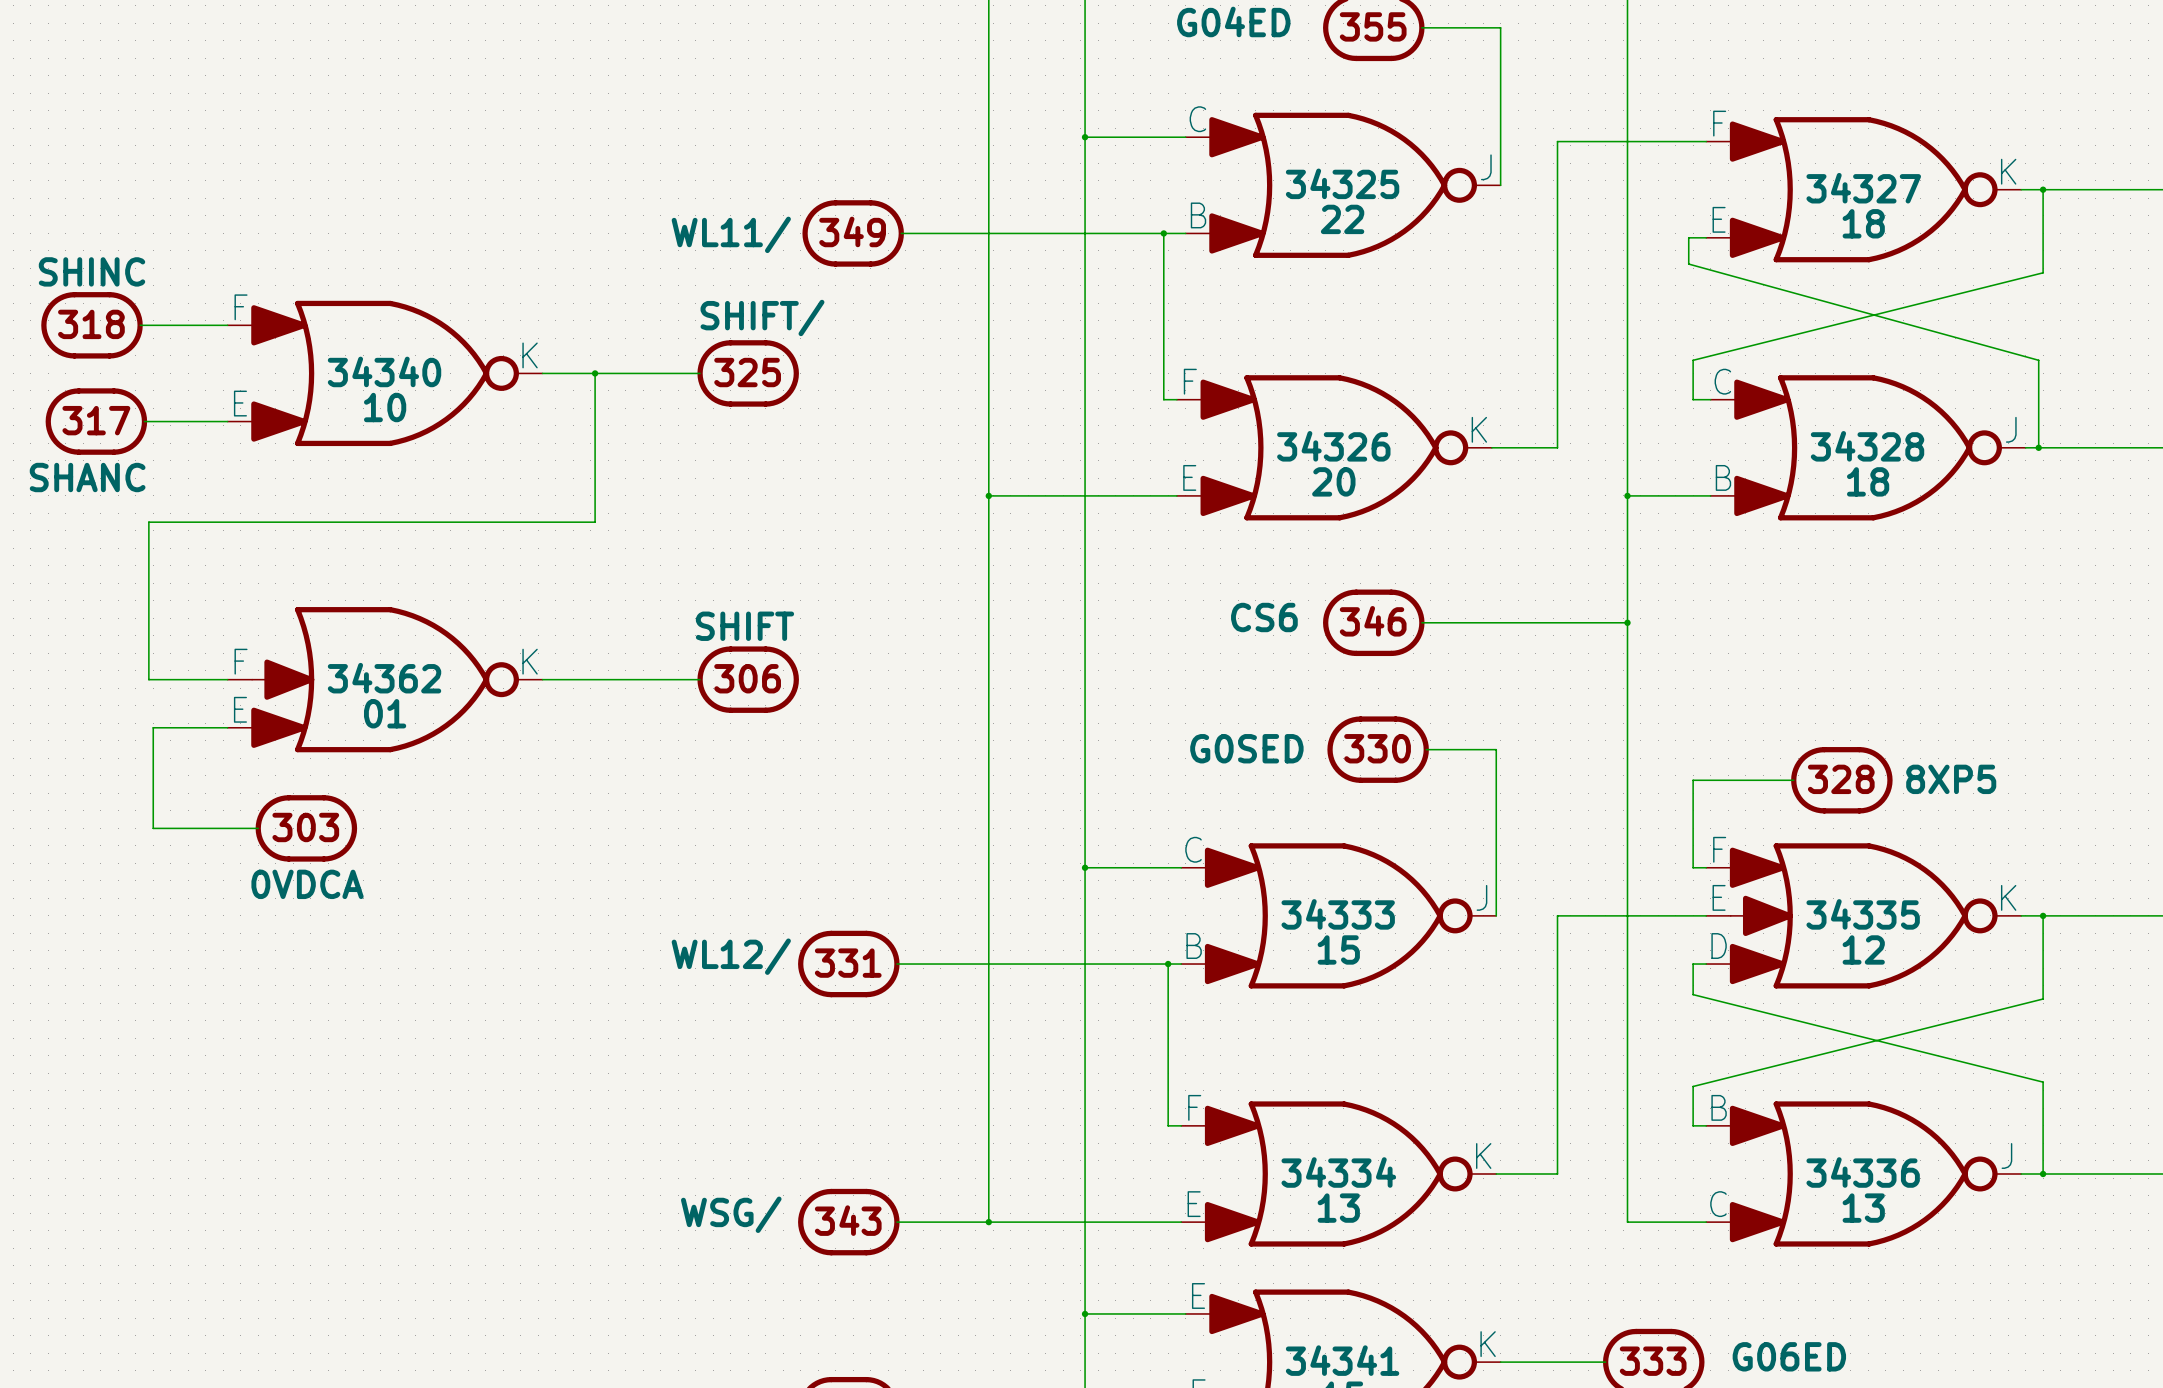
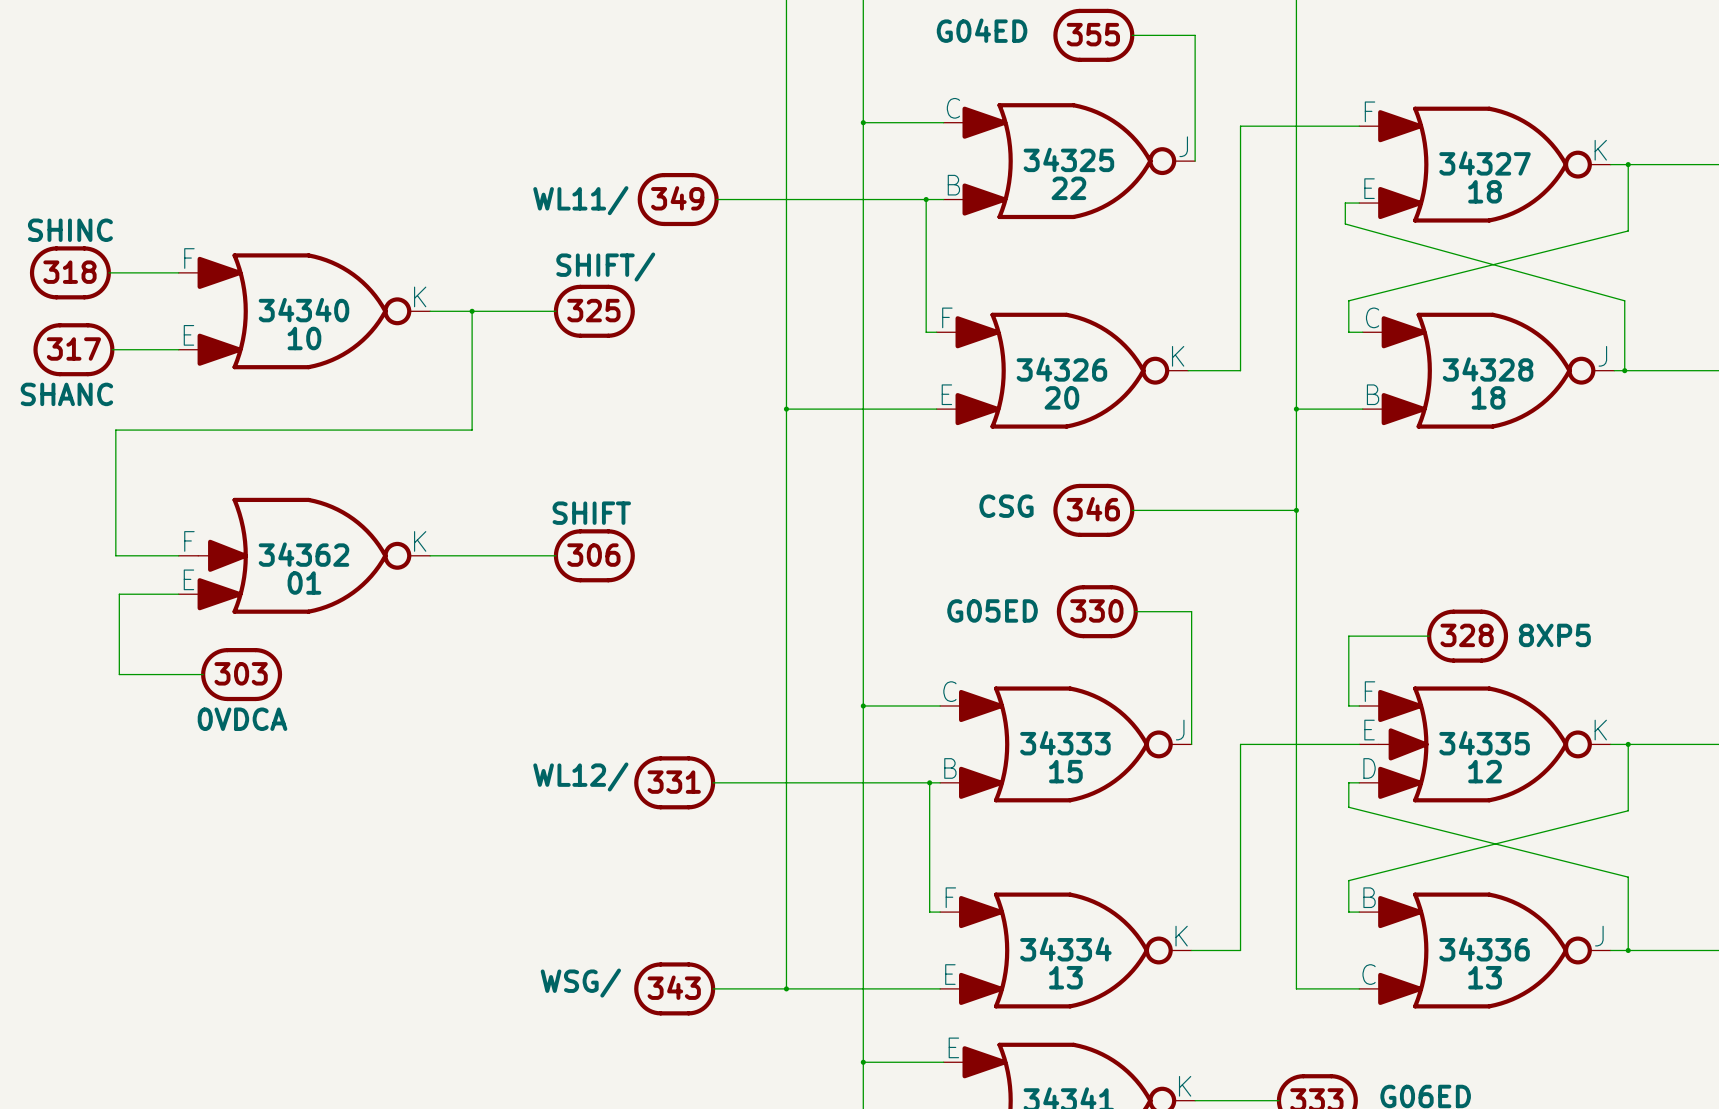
part text: CS6 (1264, 617) -> CSG (1006, 506)
part text: G0SED (1246, 748) -> G05ED (992, 610)

